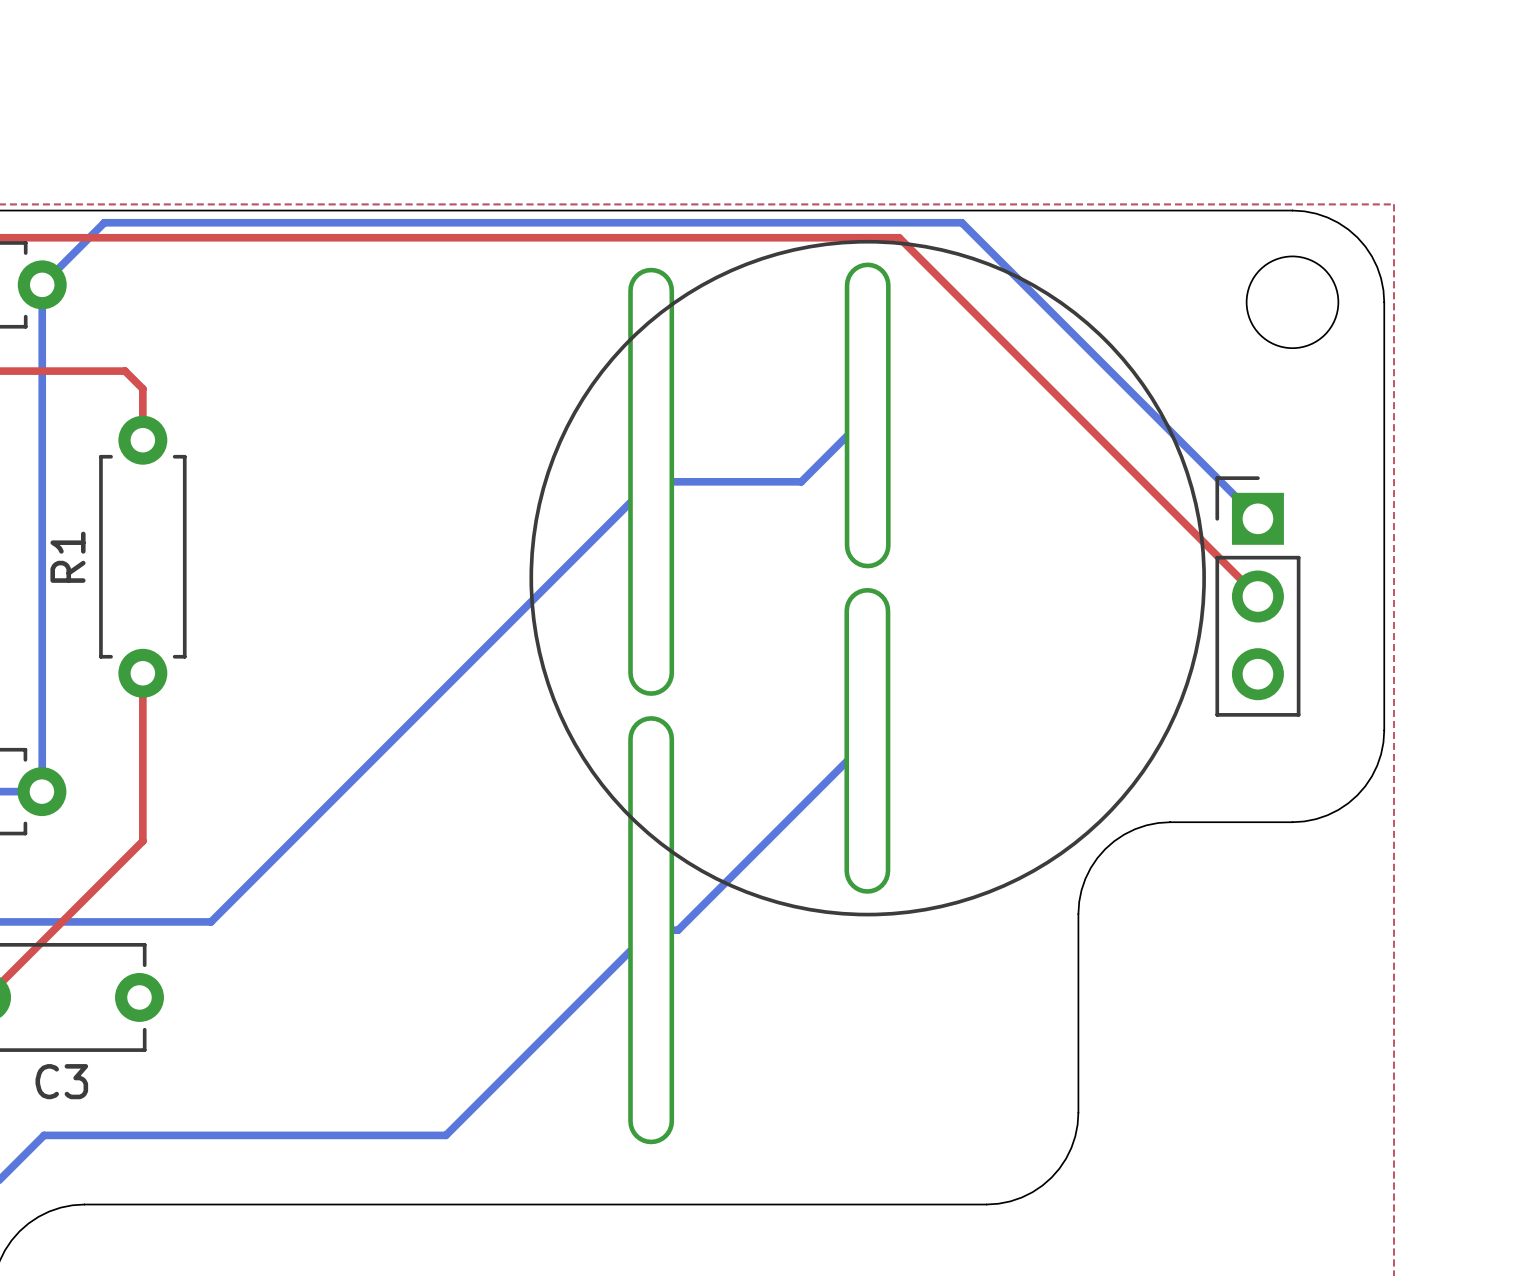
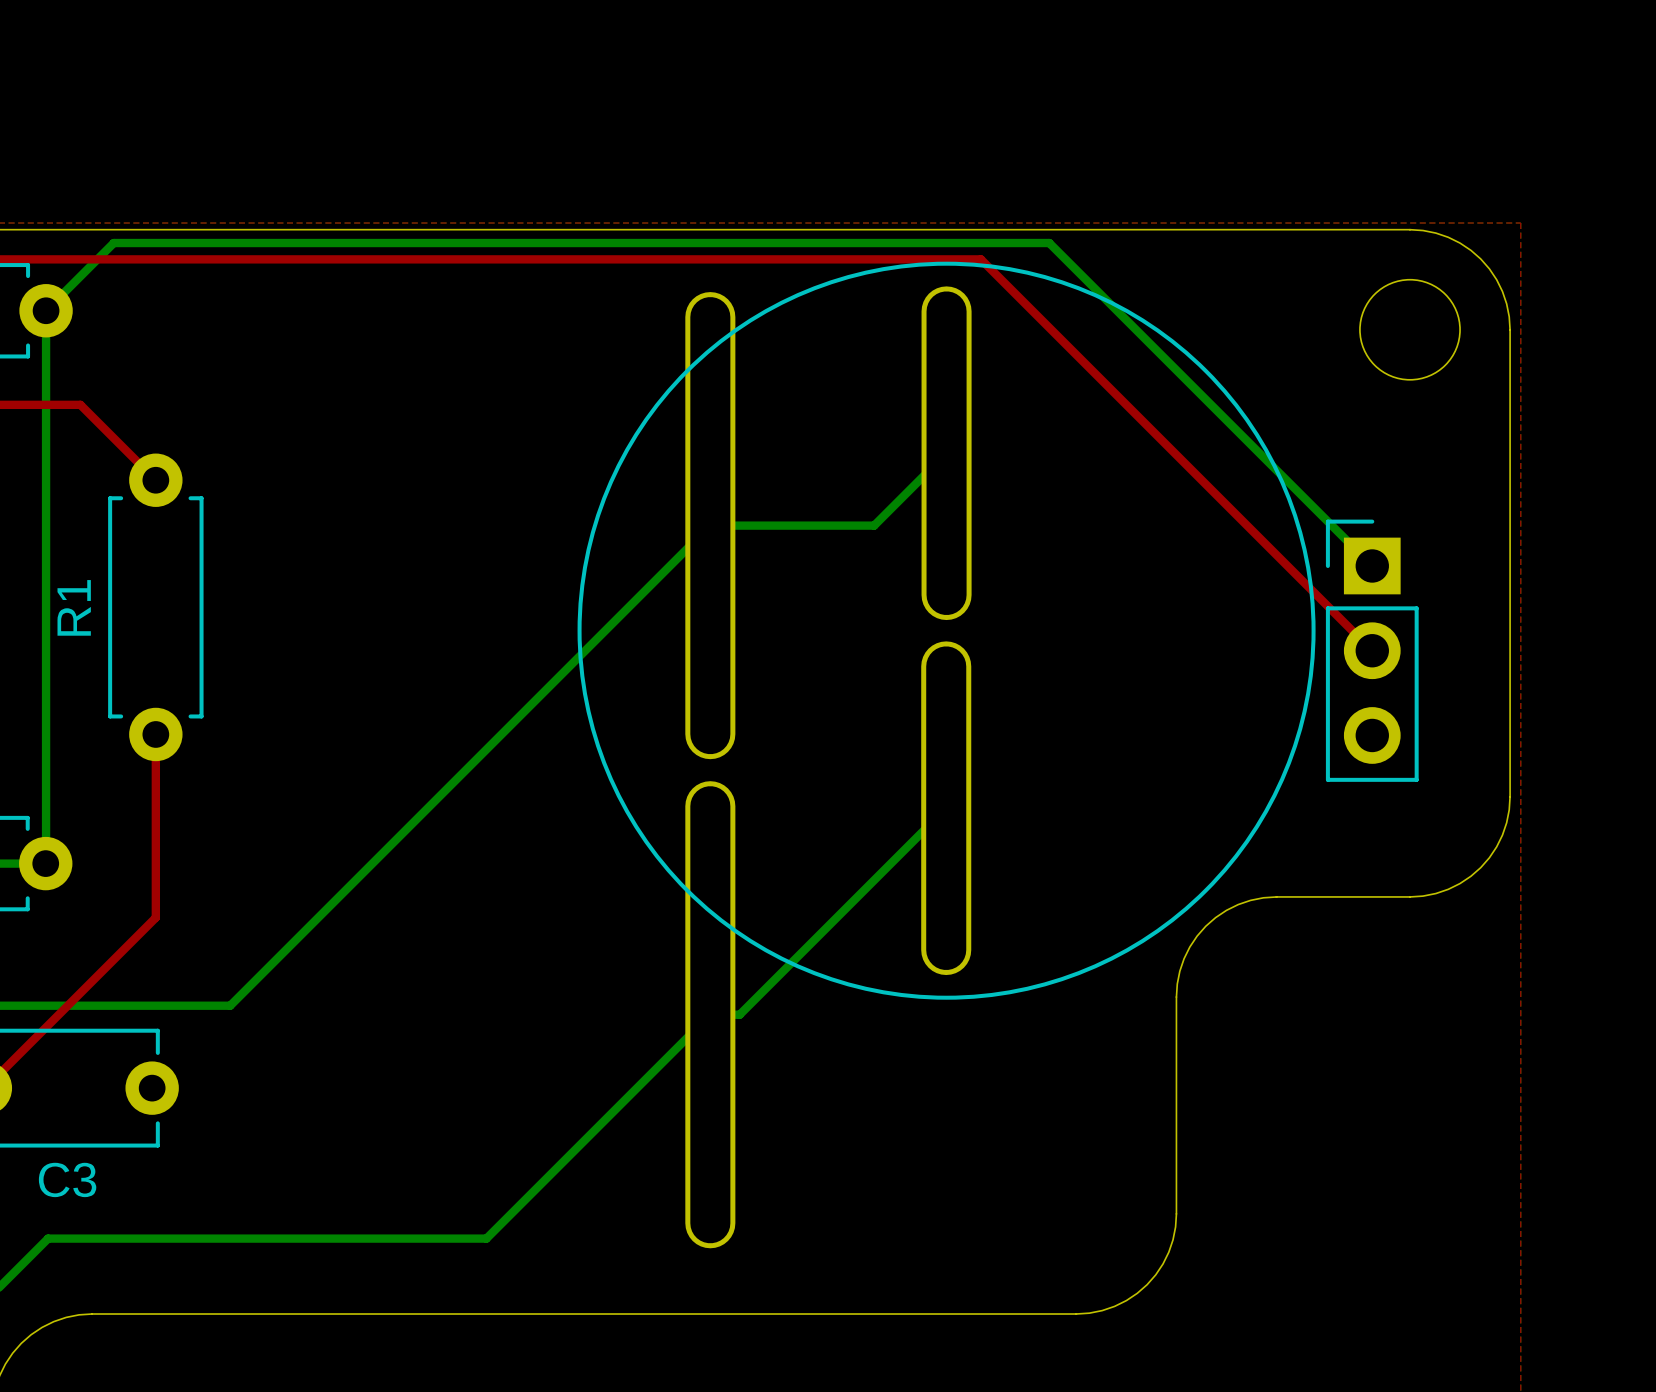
top track: (73, 371) (125, 371) (142, 388) (142, 440) -> (80, 404) (155, 480)

